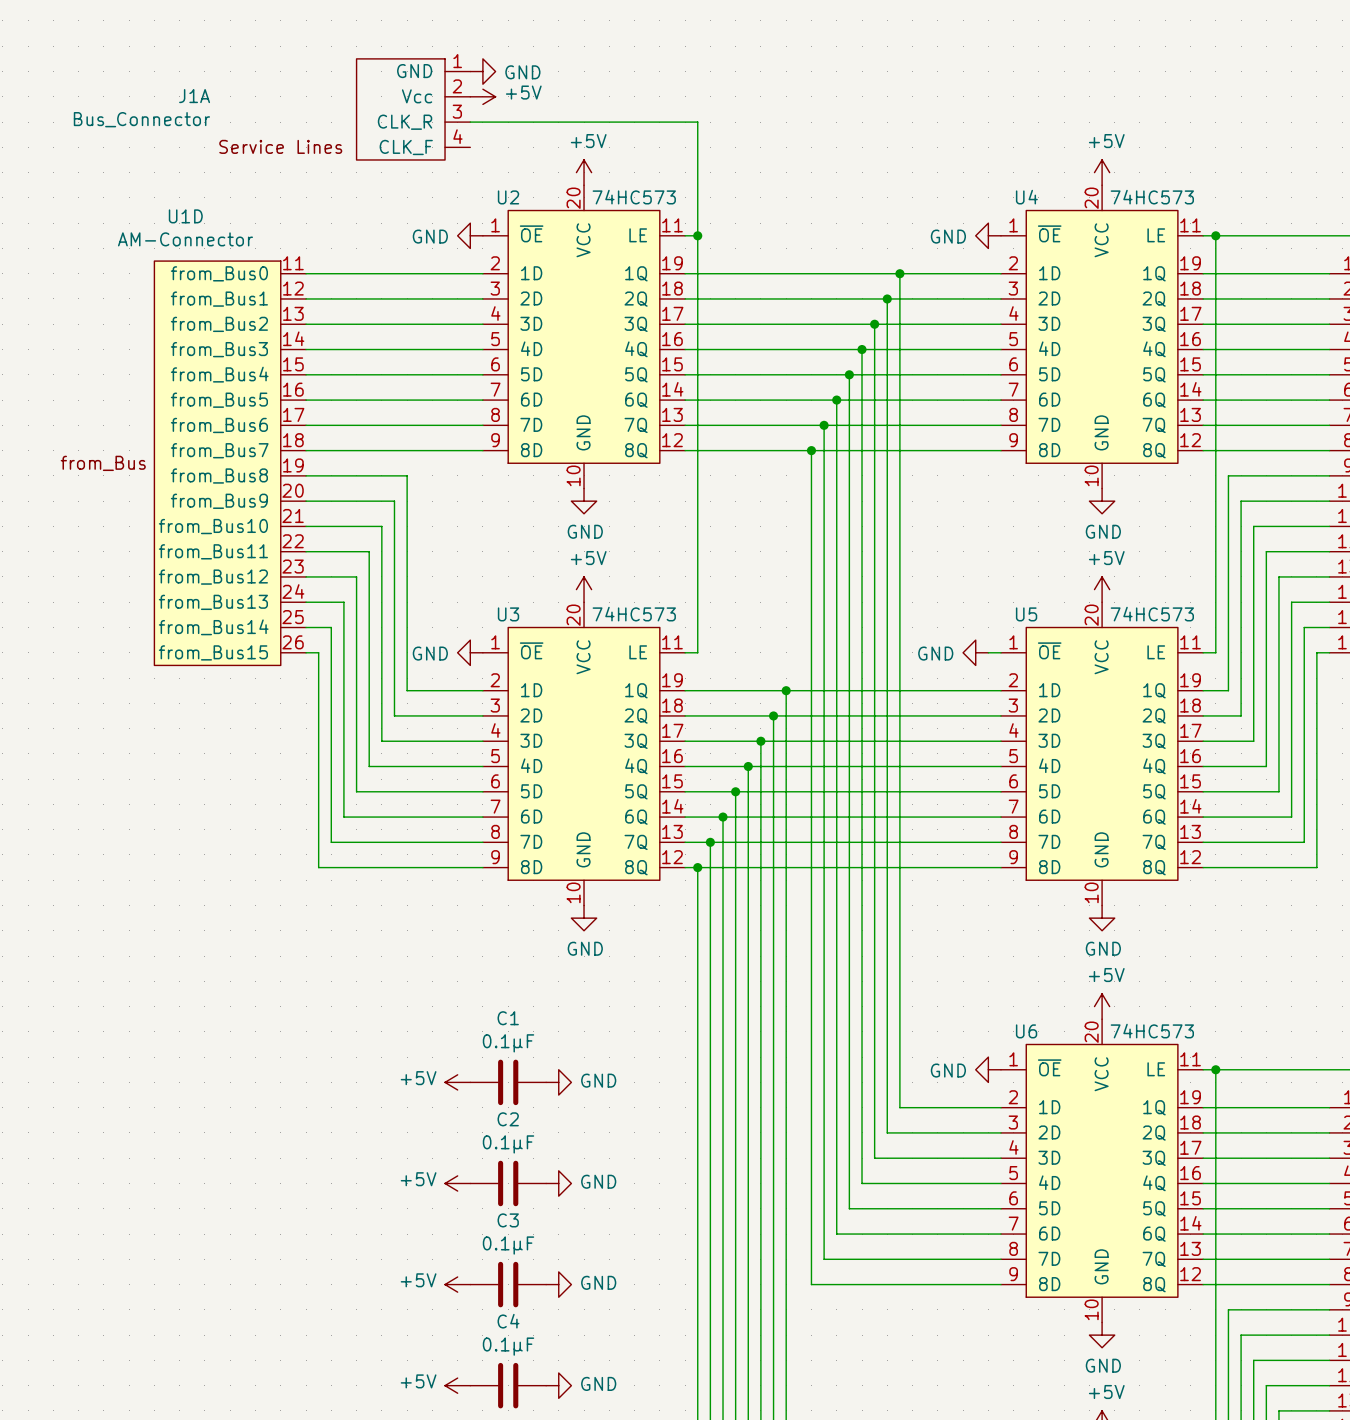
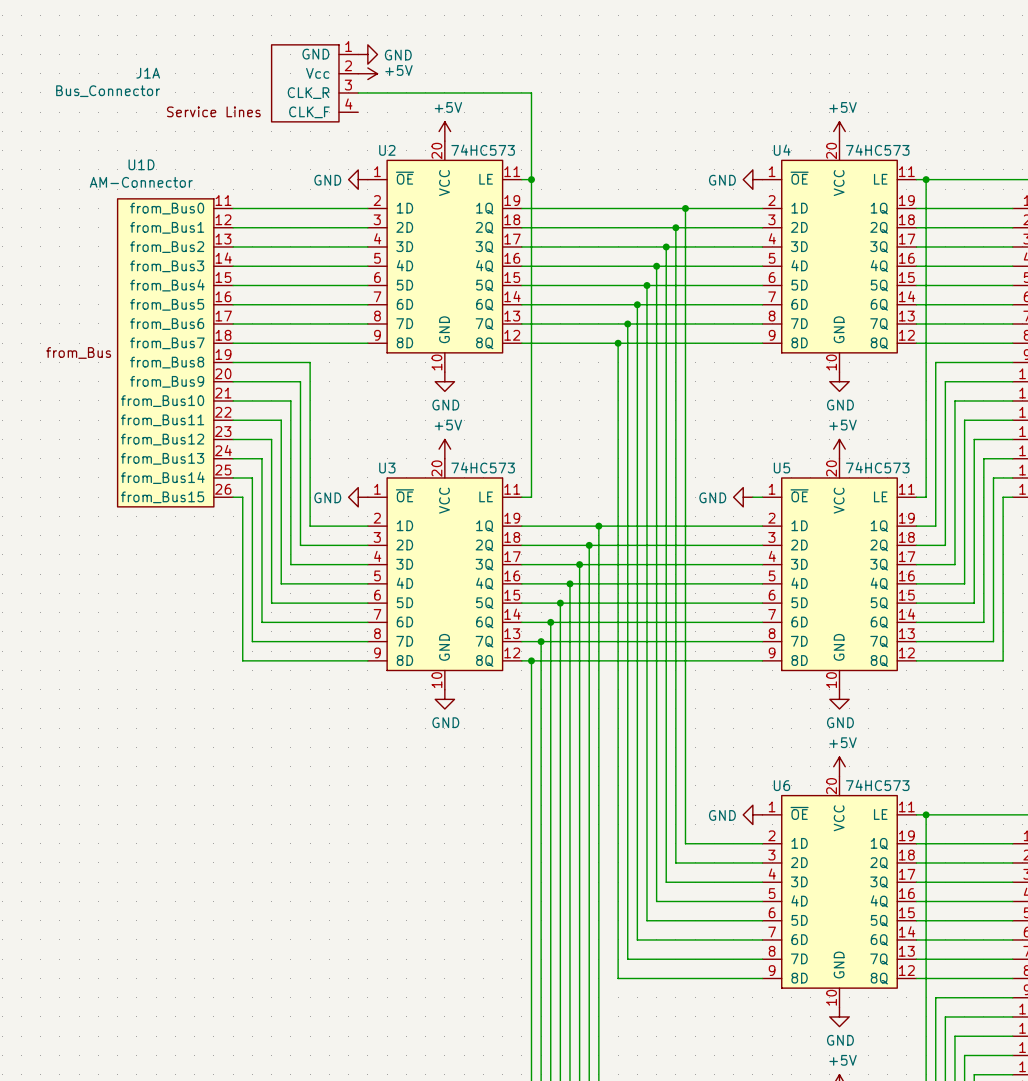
power symbol: +5V (457, 1082) -> none
C1: 0.1µF (508, 1082) -> none
power symbol: GND (558, 1082) -> none
power symbol: +5V (457, 1183) -> none
C2: 0.1µF (508, 1183) -> none
power symbol: GND (558, 1183) -> none
power symbol: +5V (457, 1284) -> none
C3: 0.1µF (508, 1284) -> none
power symbol: GND (558, 1284) -> none
power symbol: +5V (457, 1385) -> none
C4: 0.1µF (508, 1385) -> none
power symbol: GND (558, 1385) -> none

